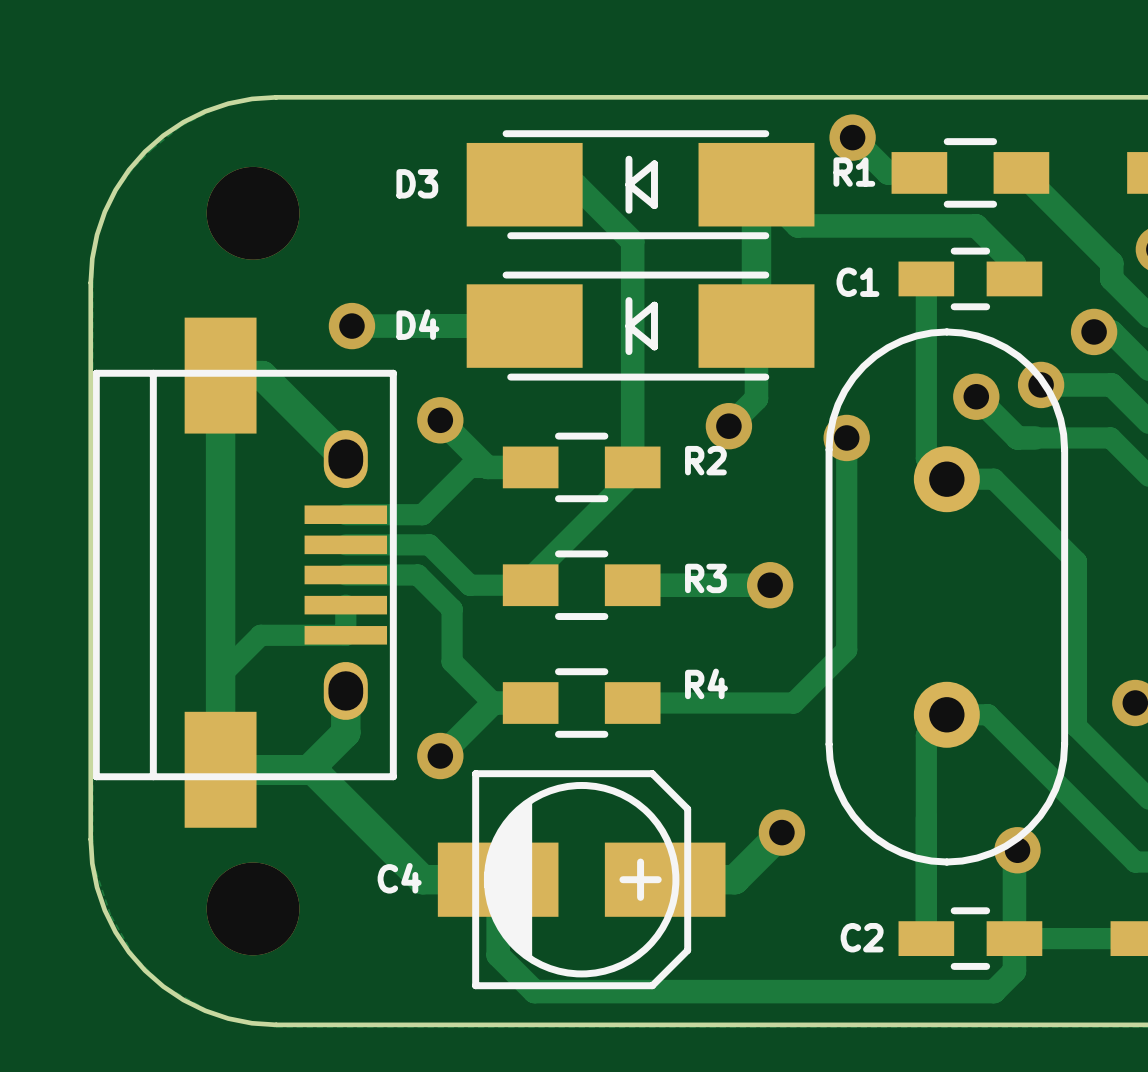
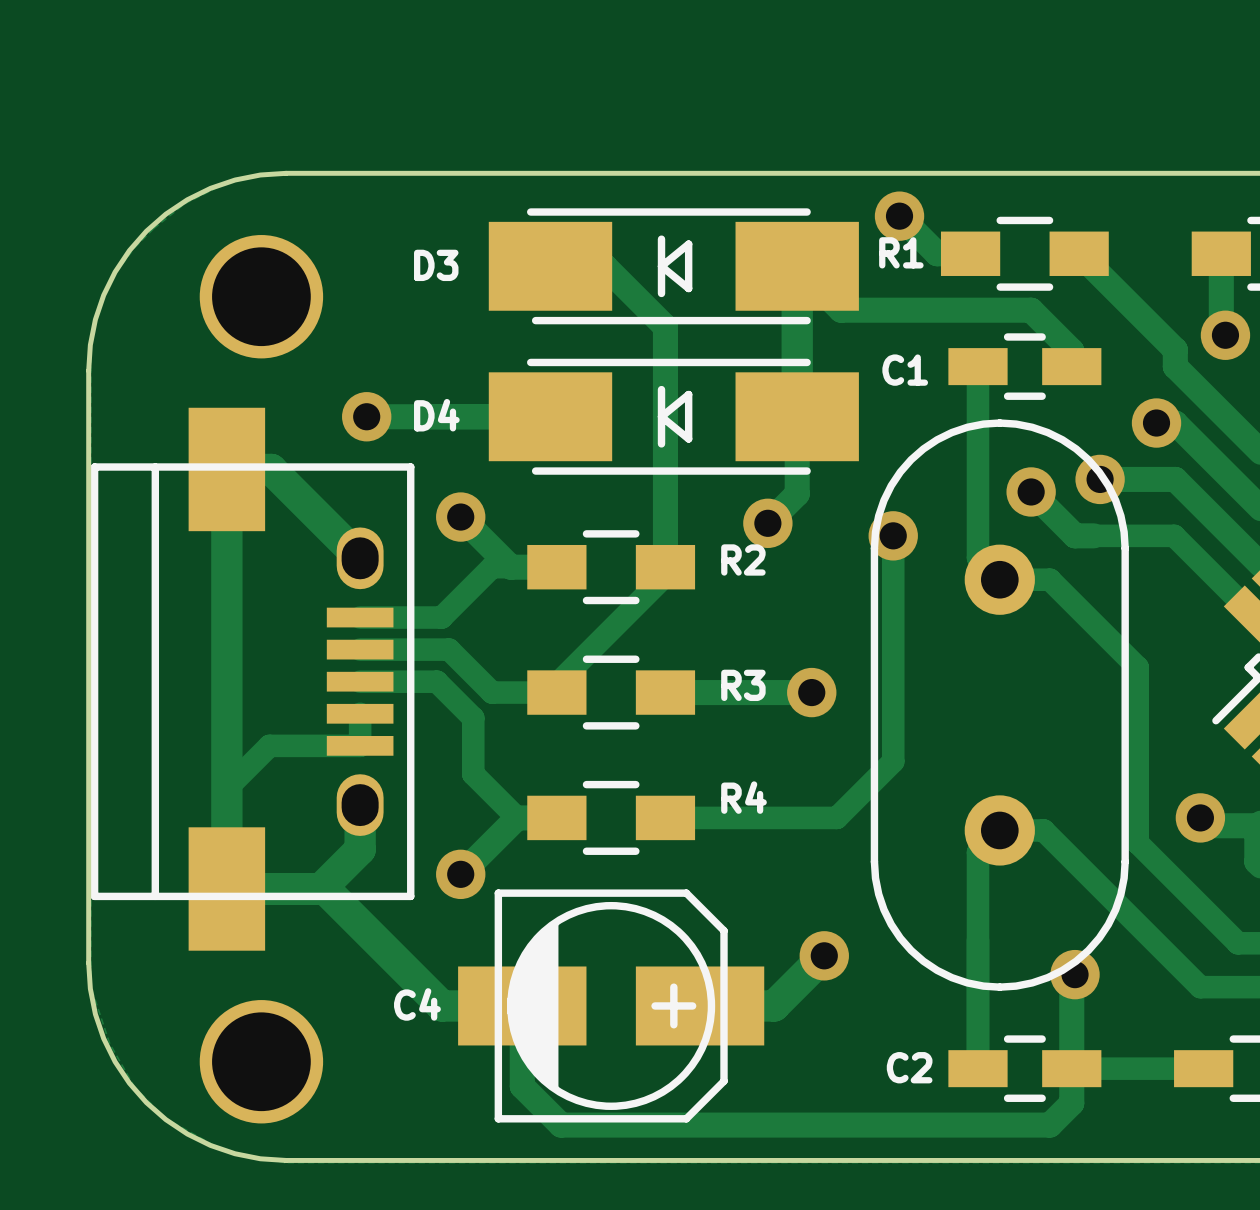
part footprint: [206, 166, 300, 260] -> [199, 235, 324, 359]
part footprint: [92, 317, 397, 828] -> [90, 407, 415, 951]
part footprint: [206, 862, 300, 956] -> [199, 1000, 324, 1124]

